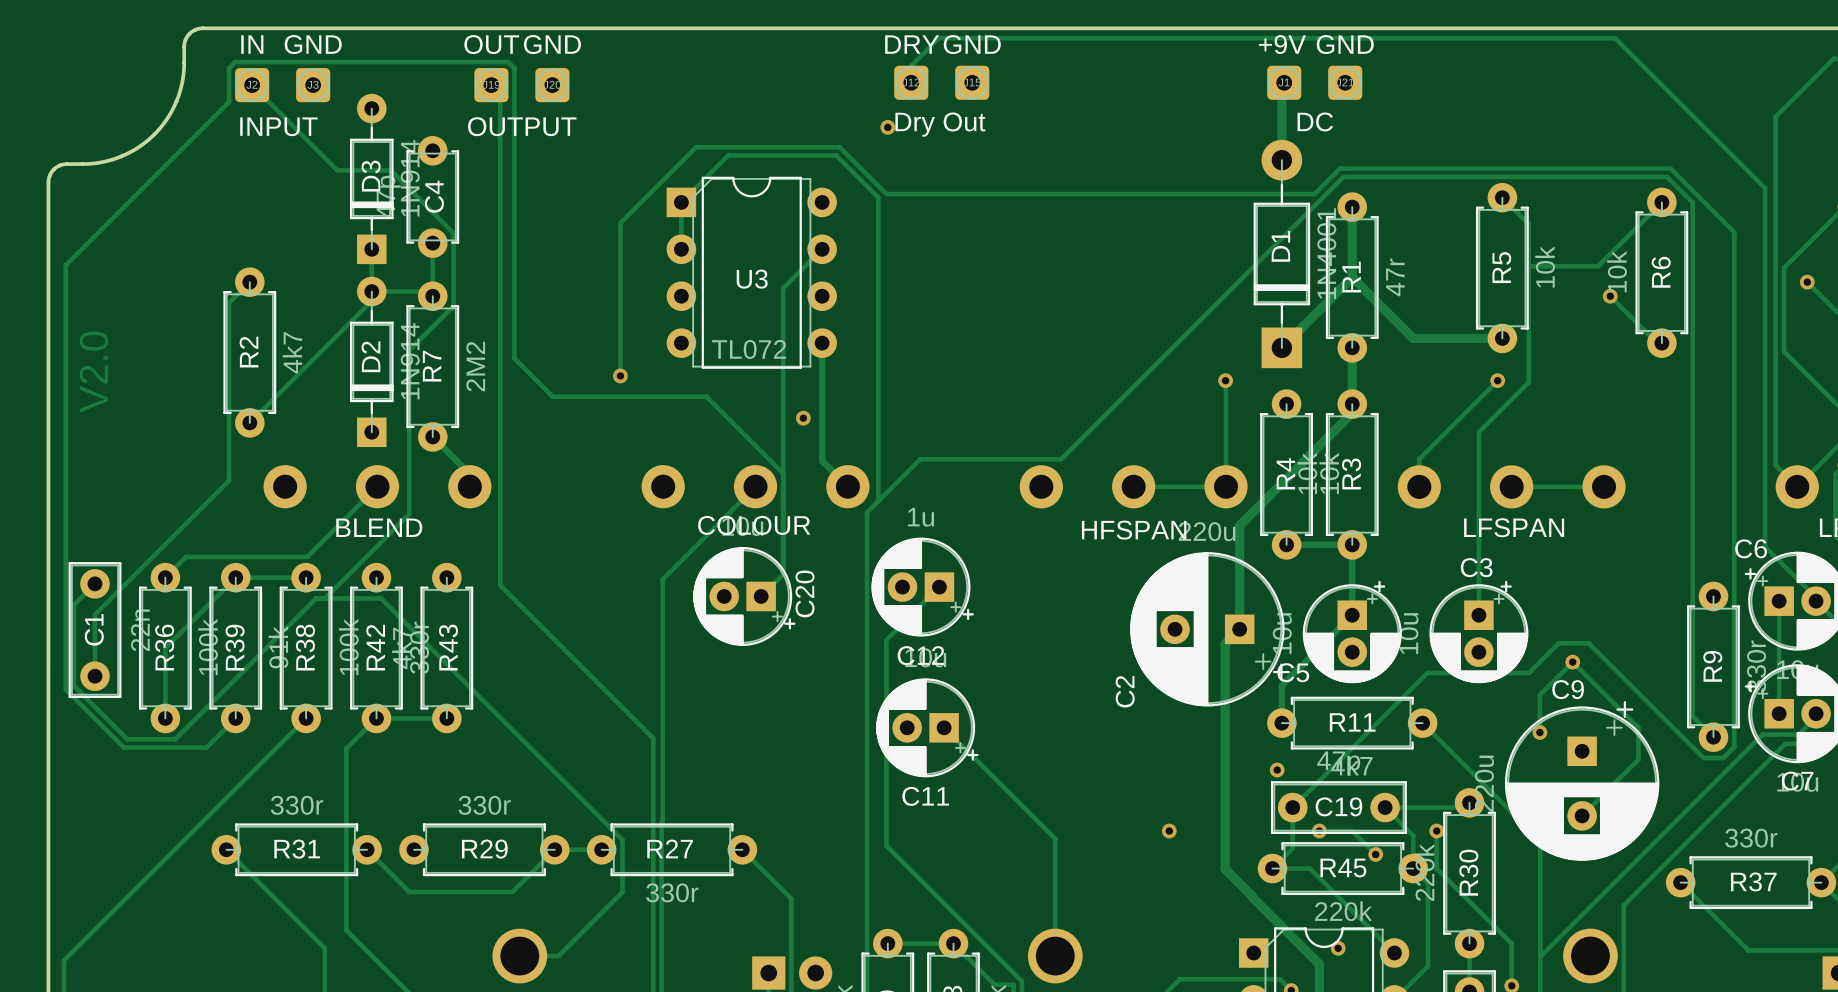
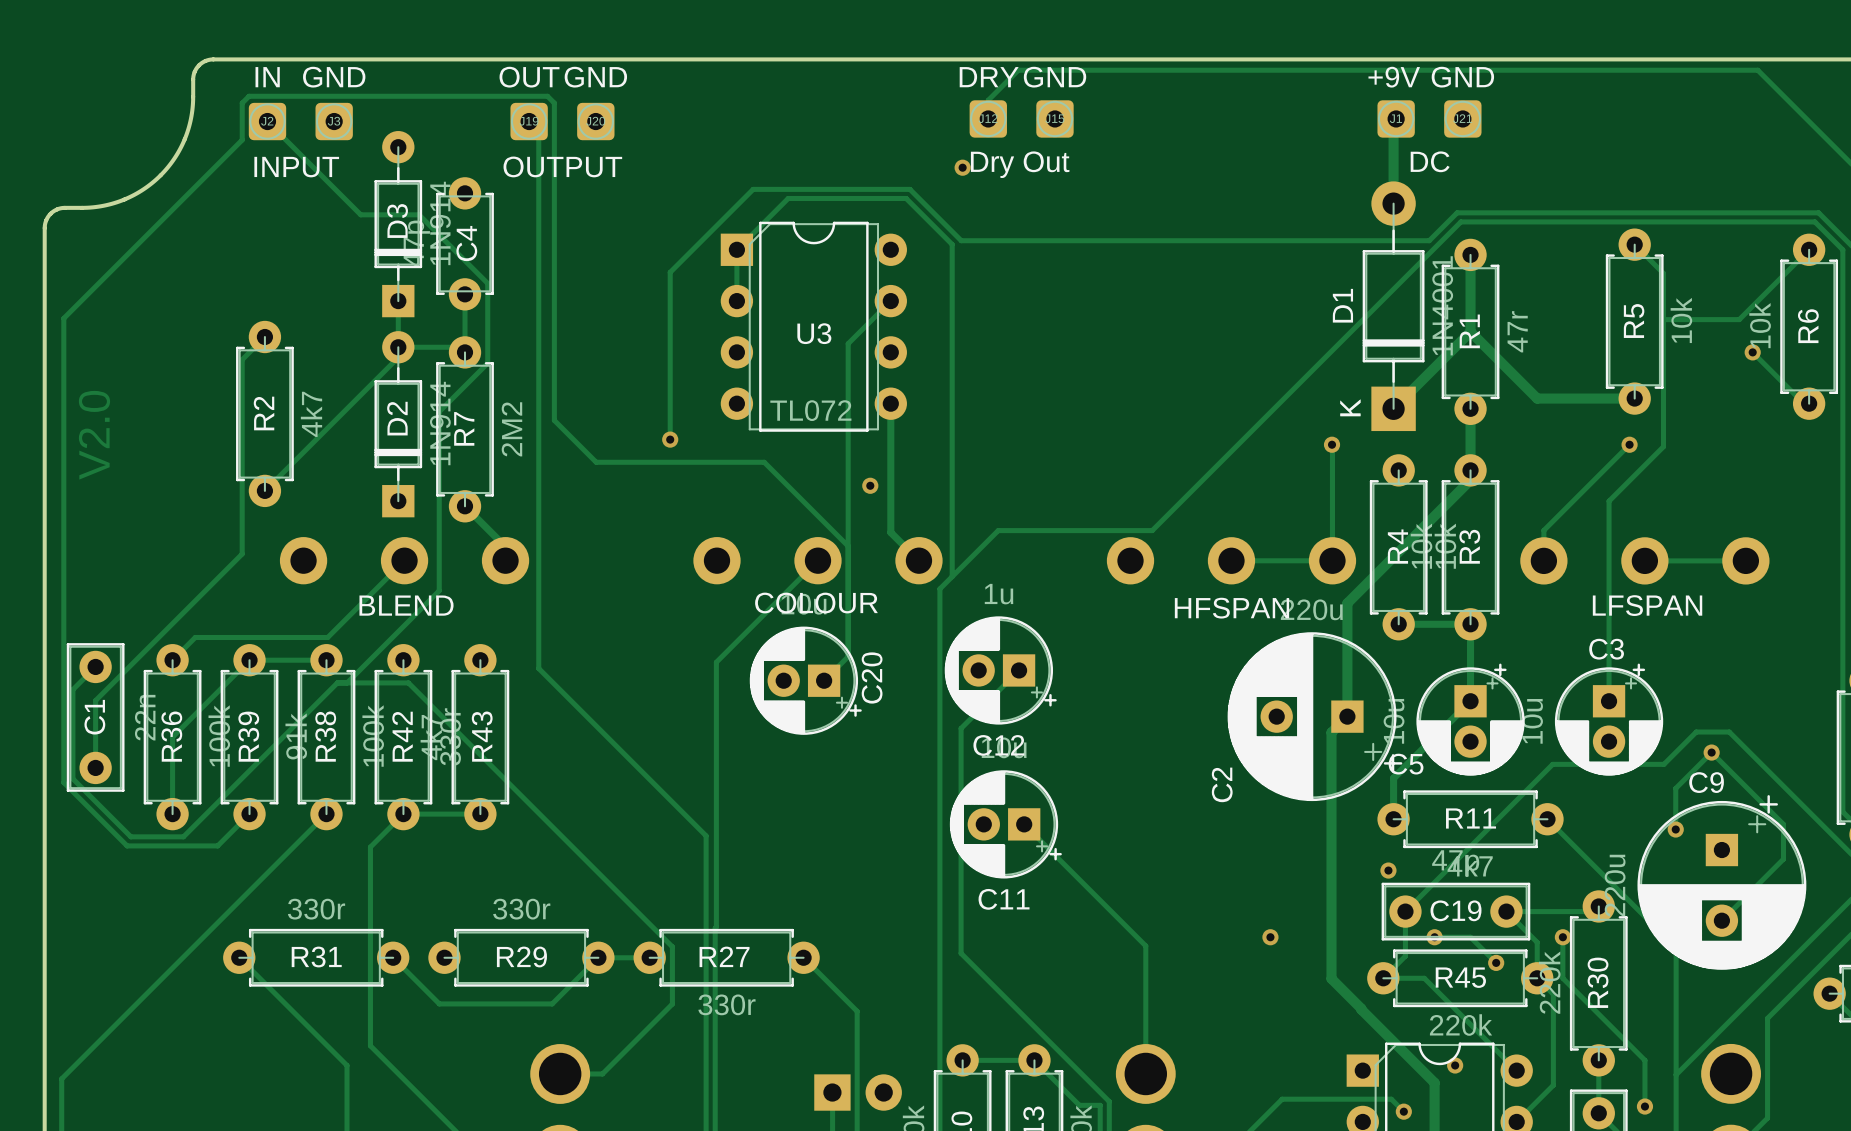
D1 footprint: [1253, 139, 1311, 369] -> [1362, 181, 1425, 432]
D1 name position: D1 (1280, 246) -> D1 (1342, 305)

